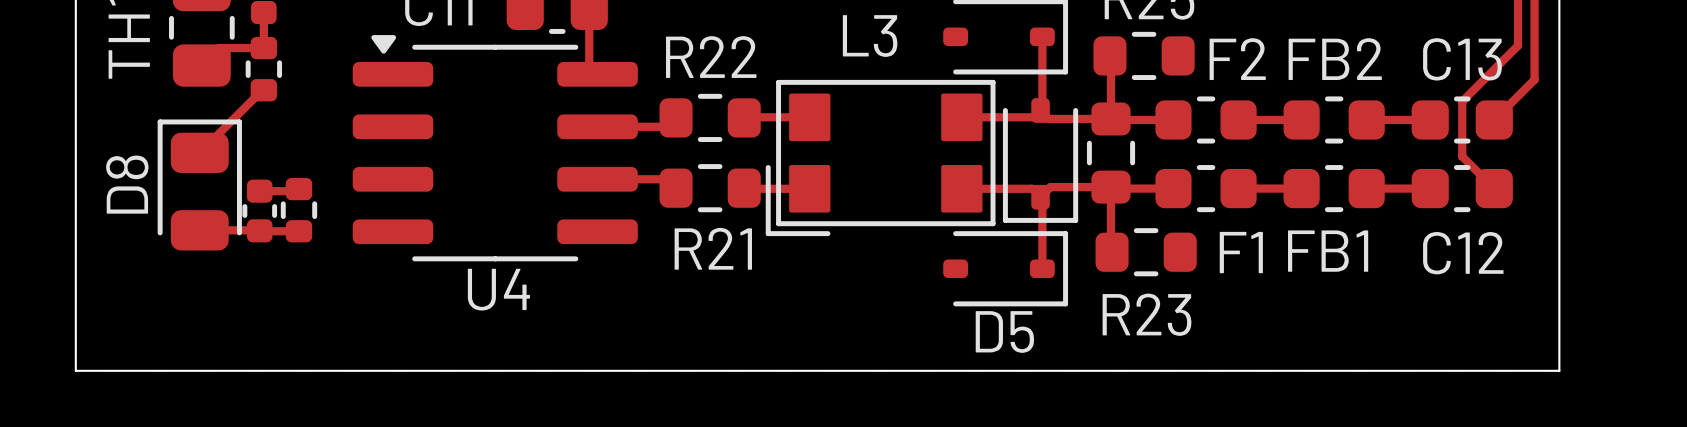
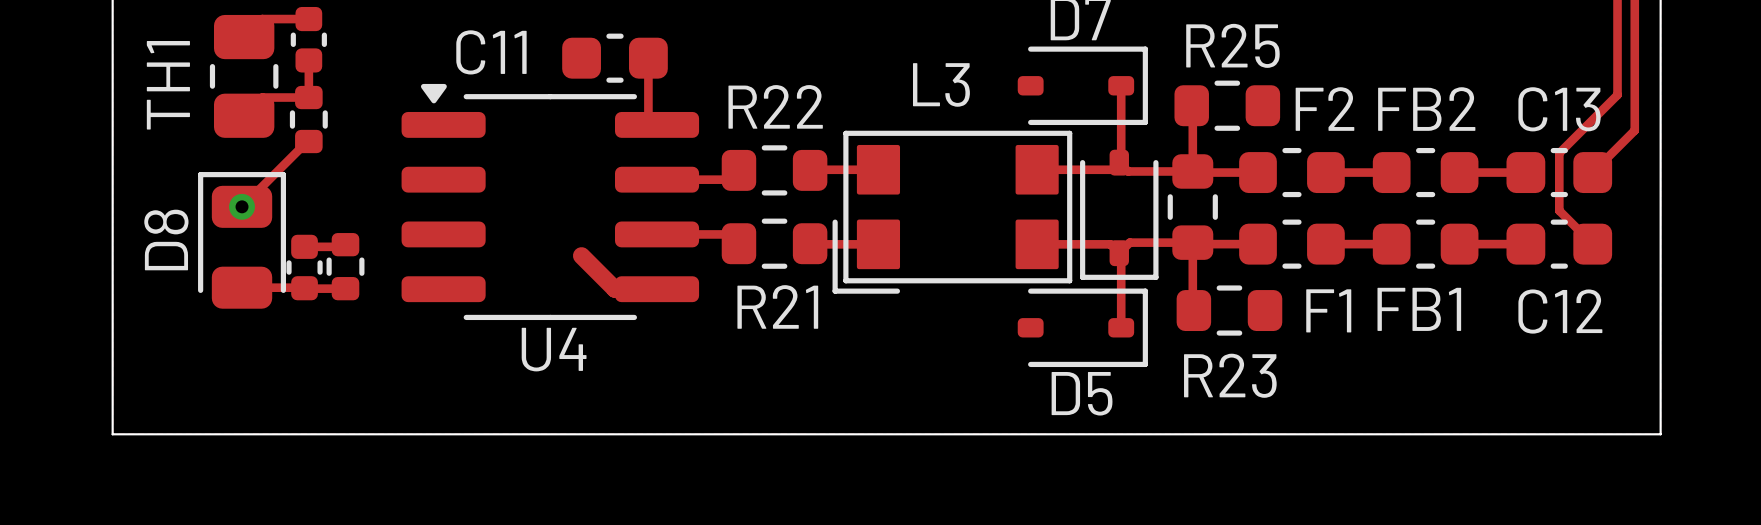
via: none -> (242, 206)
track: none -> (581, 255) (615, 289) (657, 289)

